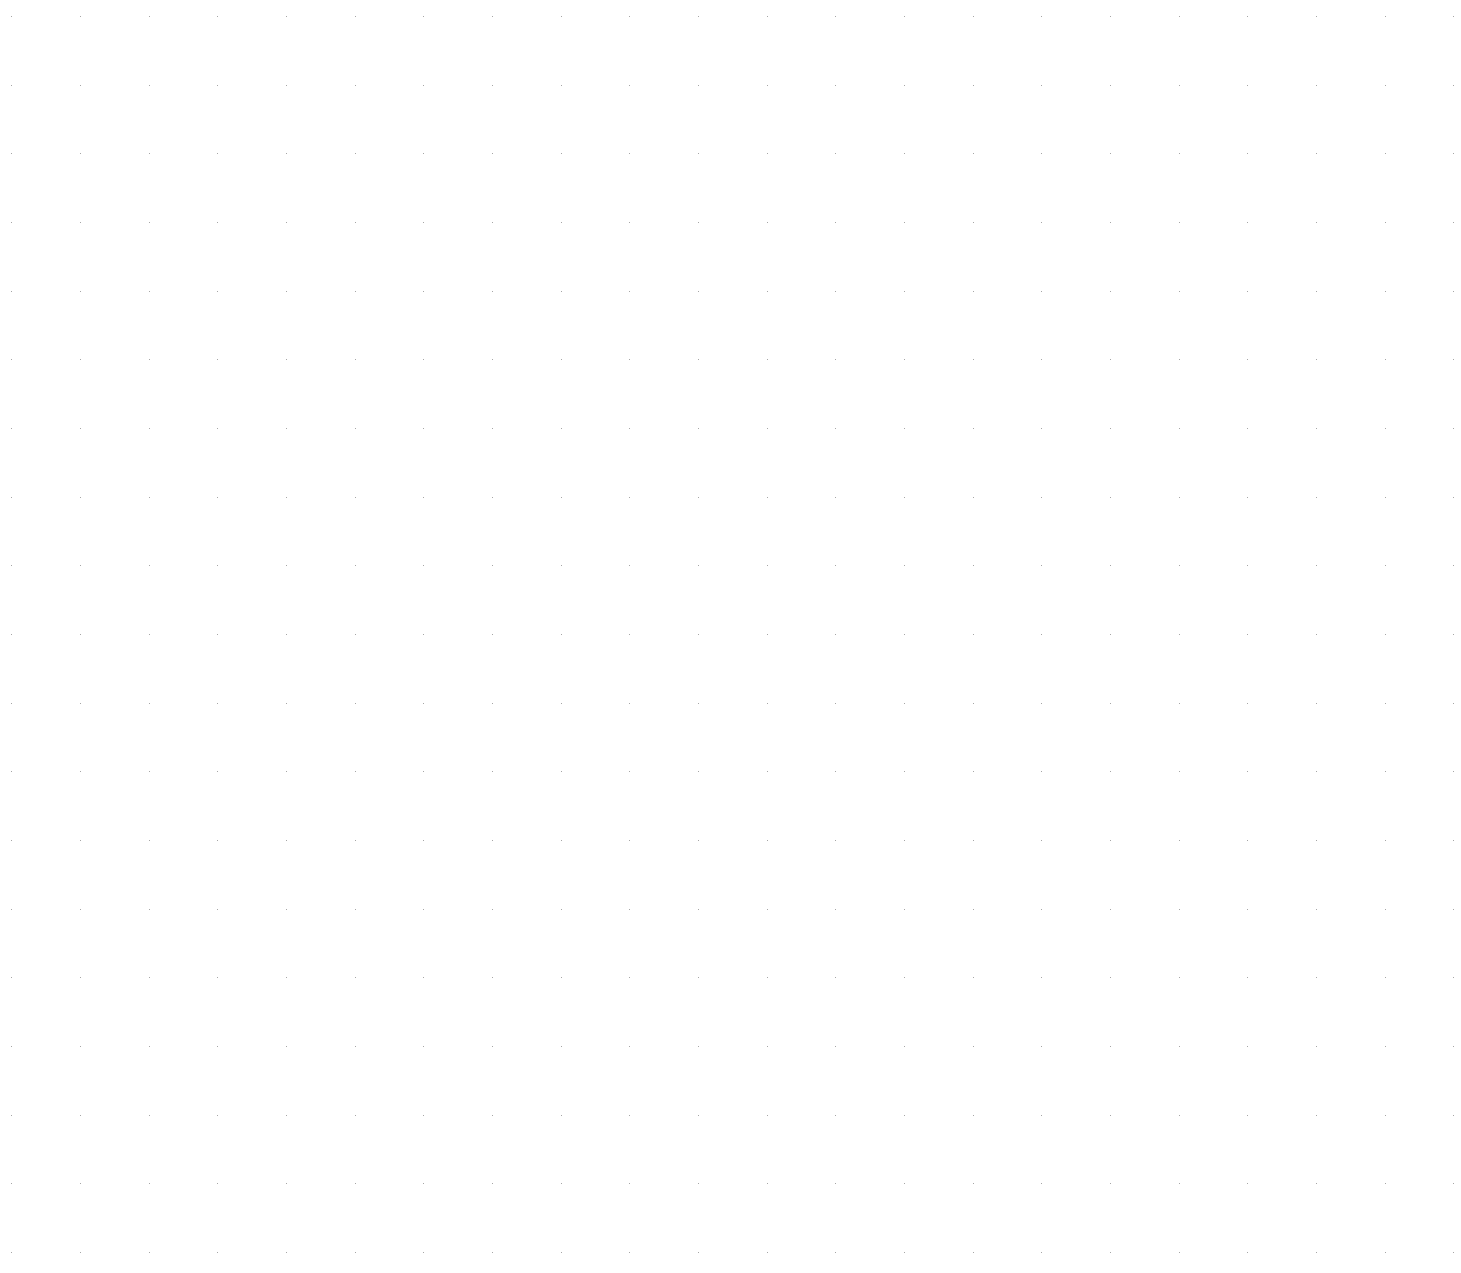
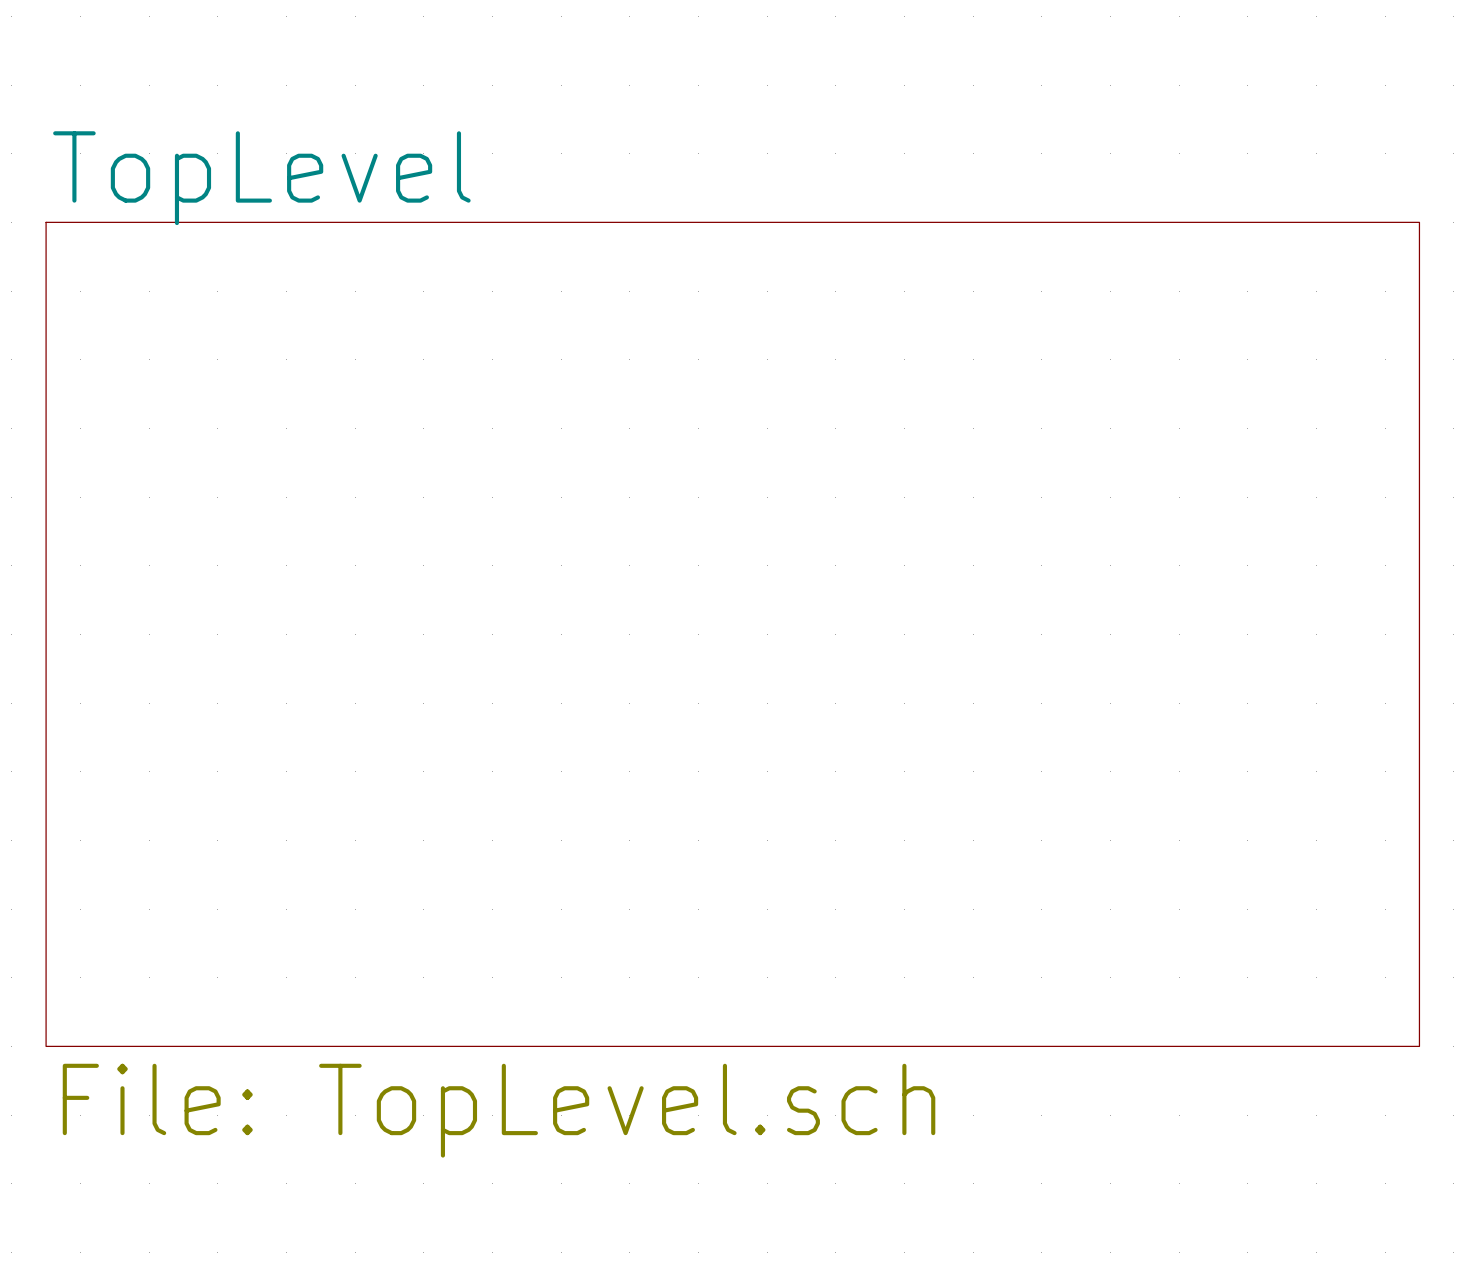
sheet TopLevel: none -> File: TopLevel.sch (732, 634)

